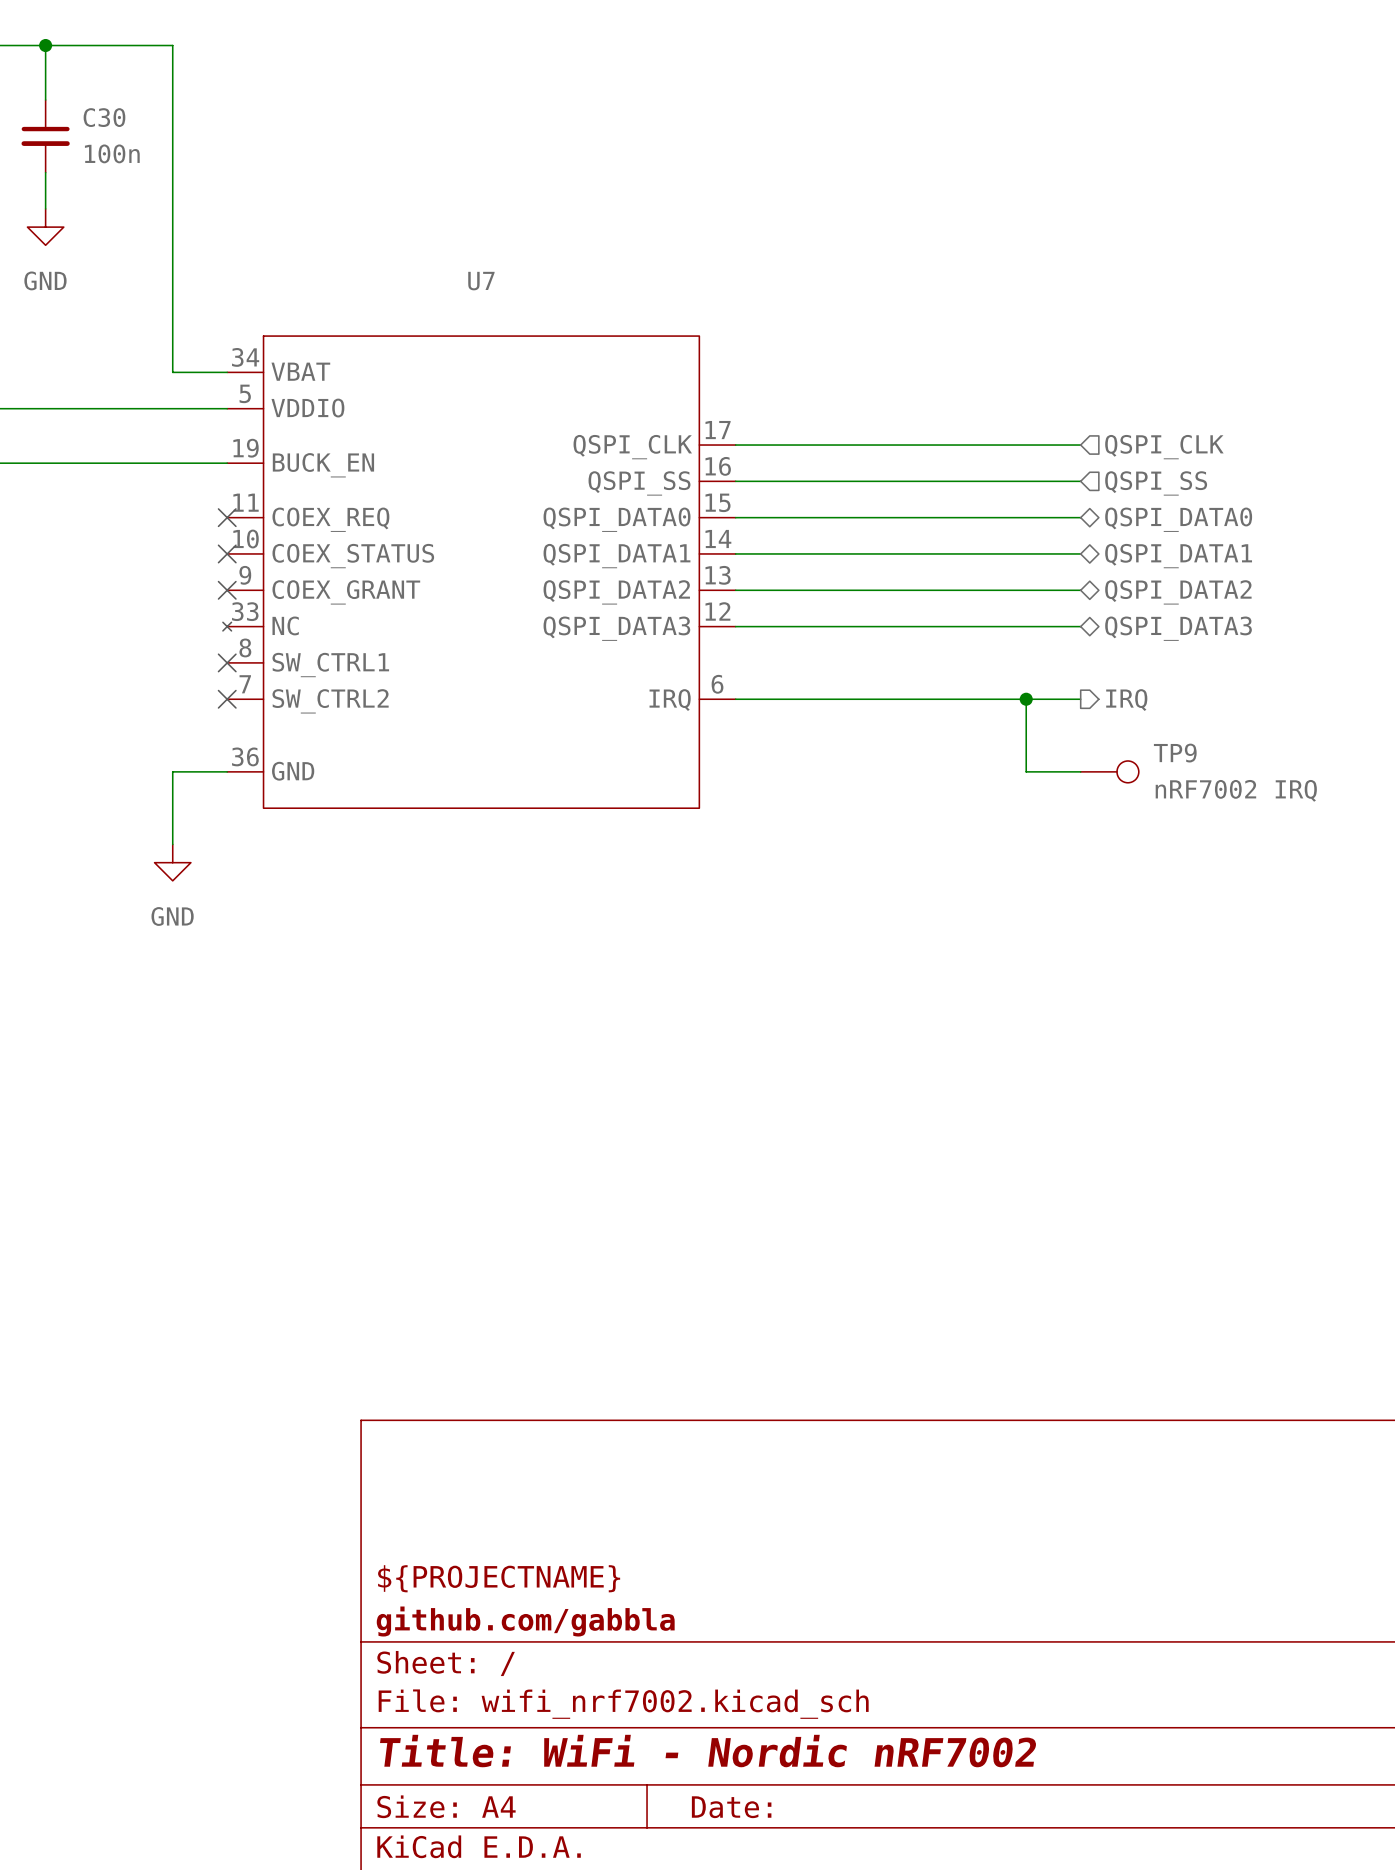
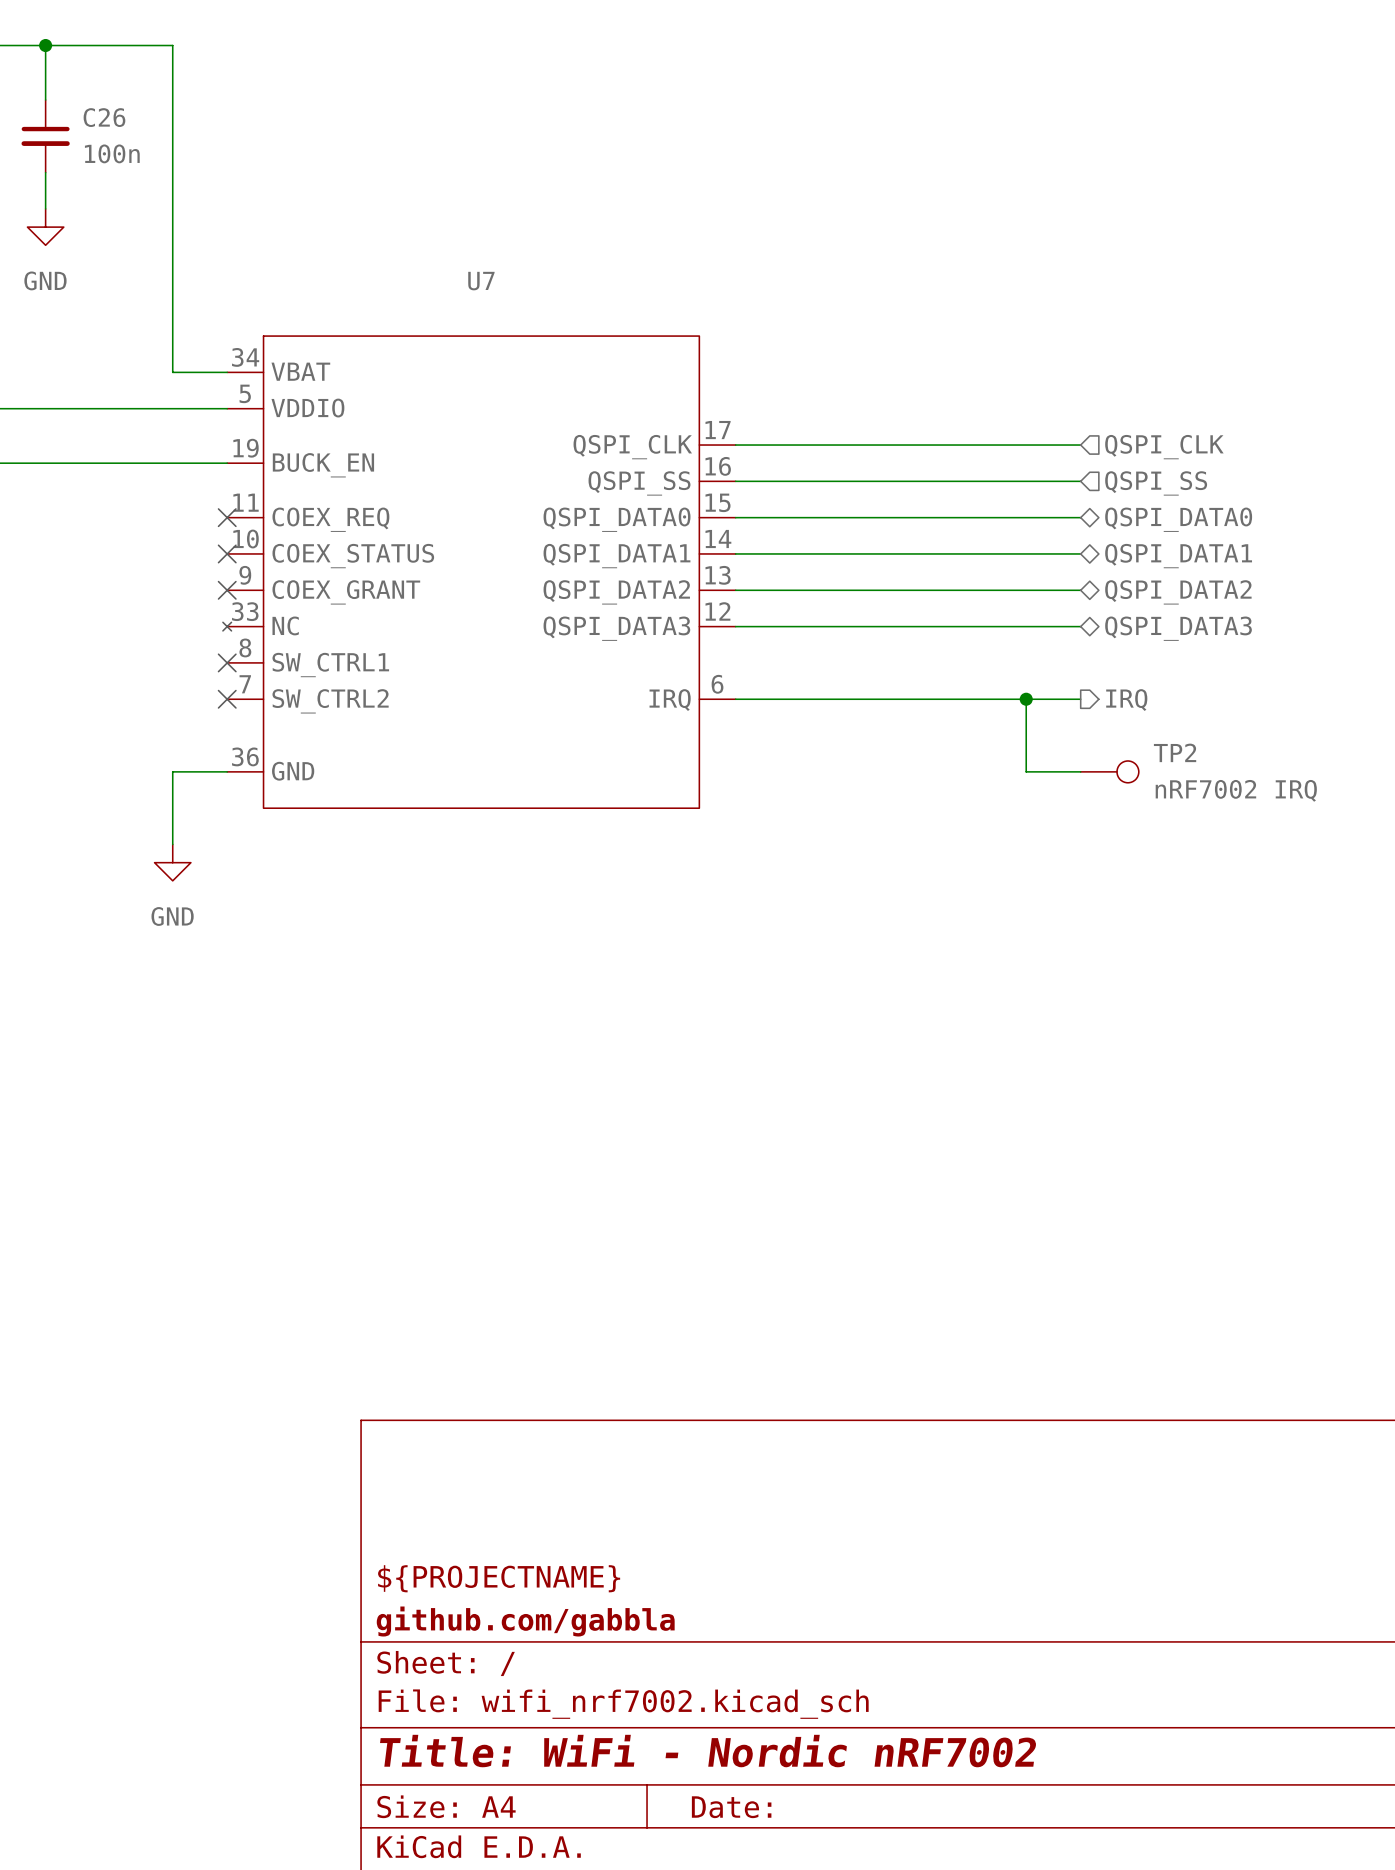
C30 name: C30 (104, 117) -> C26 (104, 117)
TP9 name: TP9 (1175, 753) -> TP2 (1175, 752)

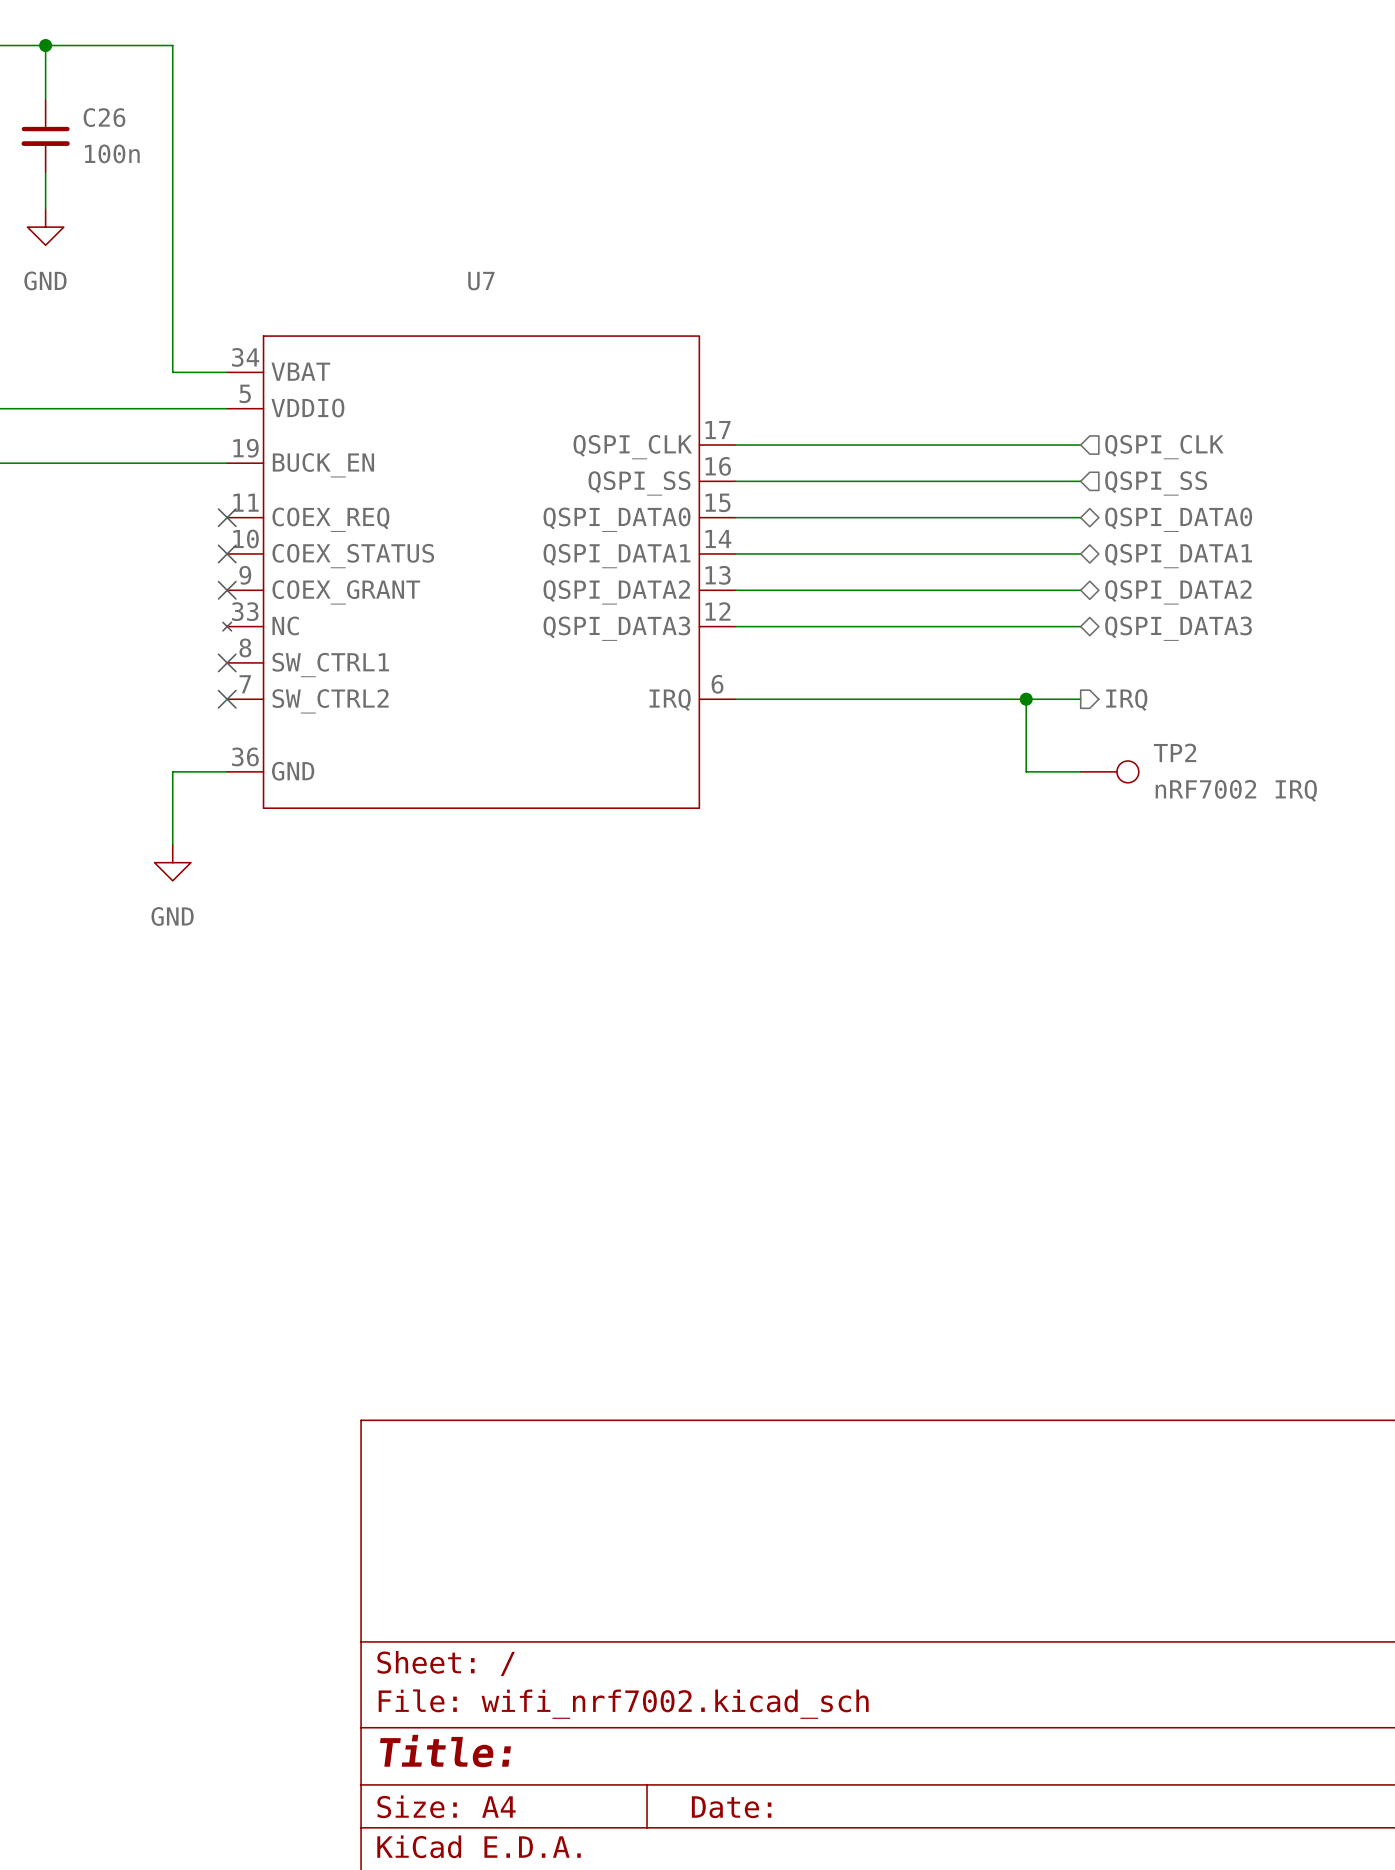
title block: ${PROJECTNAME} (499, 1578) -> none
title block: github.com/gabbla (525, 1621) -> none
title block: Title: WiFi - Nordic nRF7002 (708, 1751) -> Title: (445, 1751)

